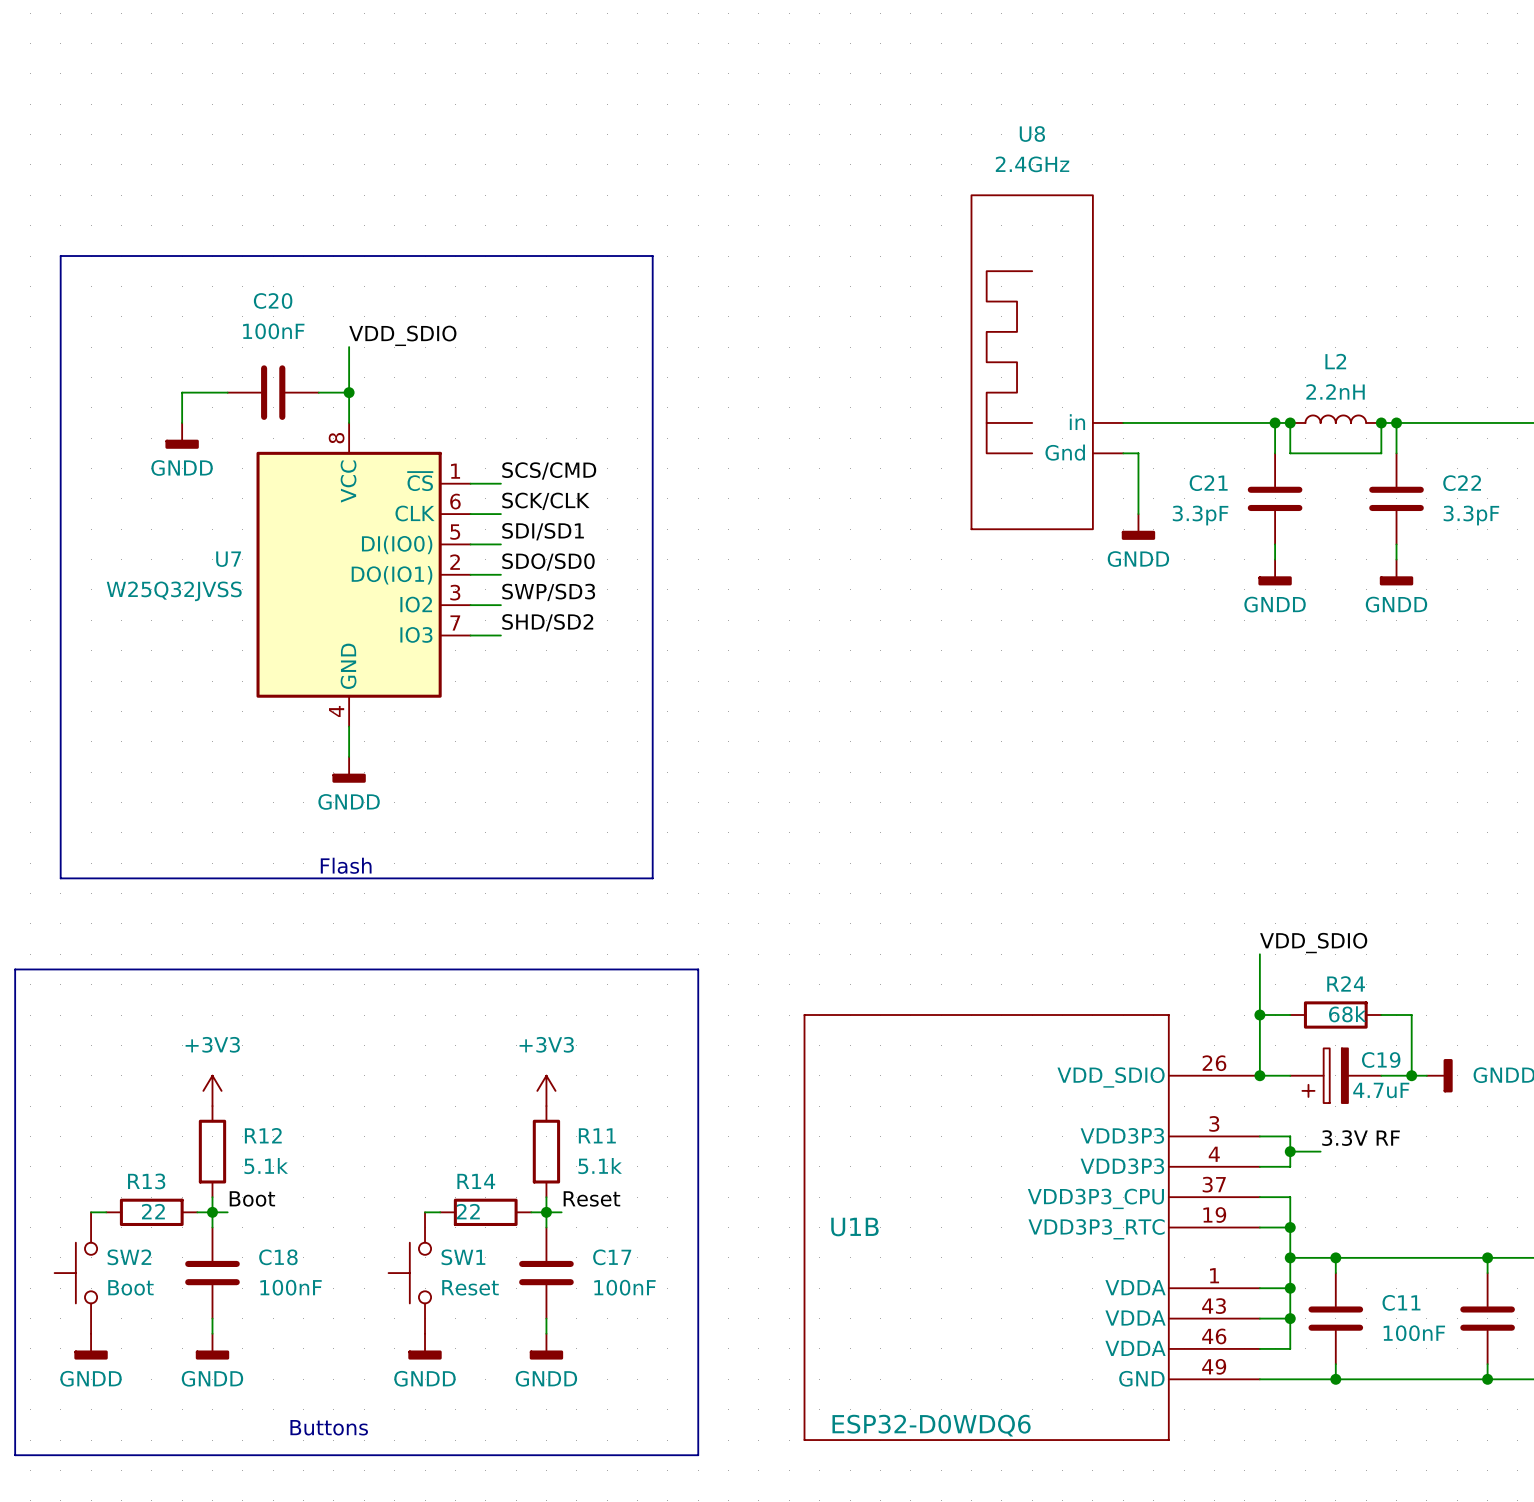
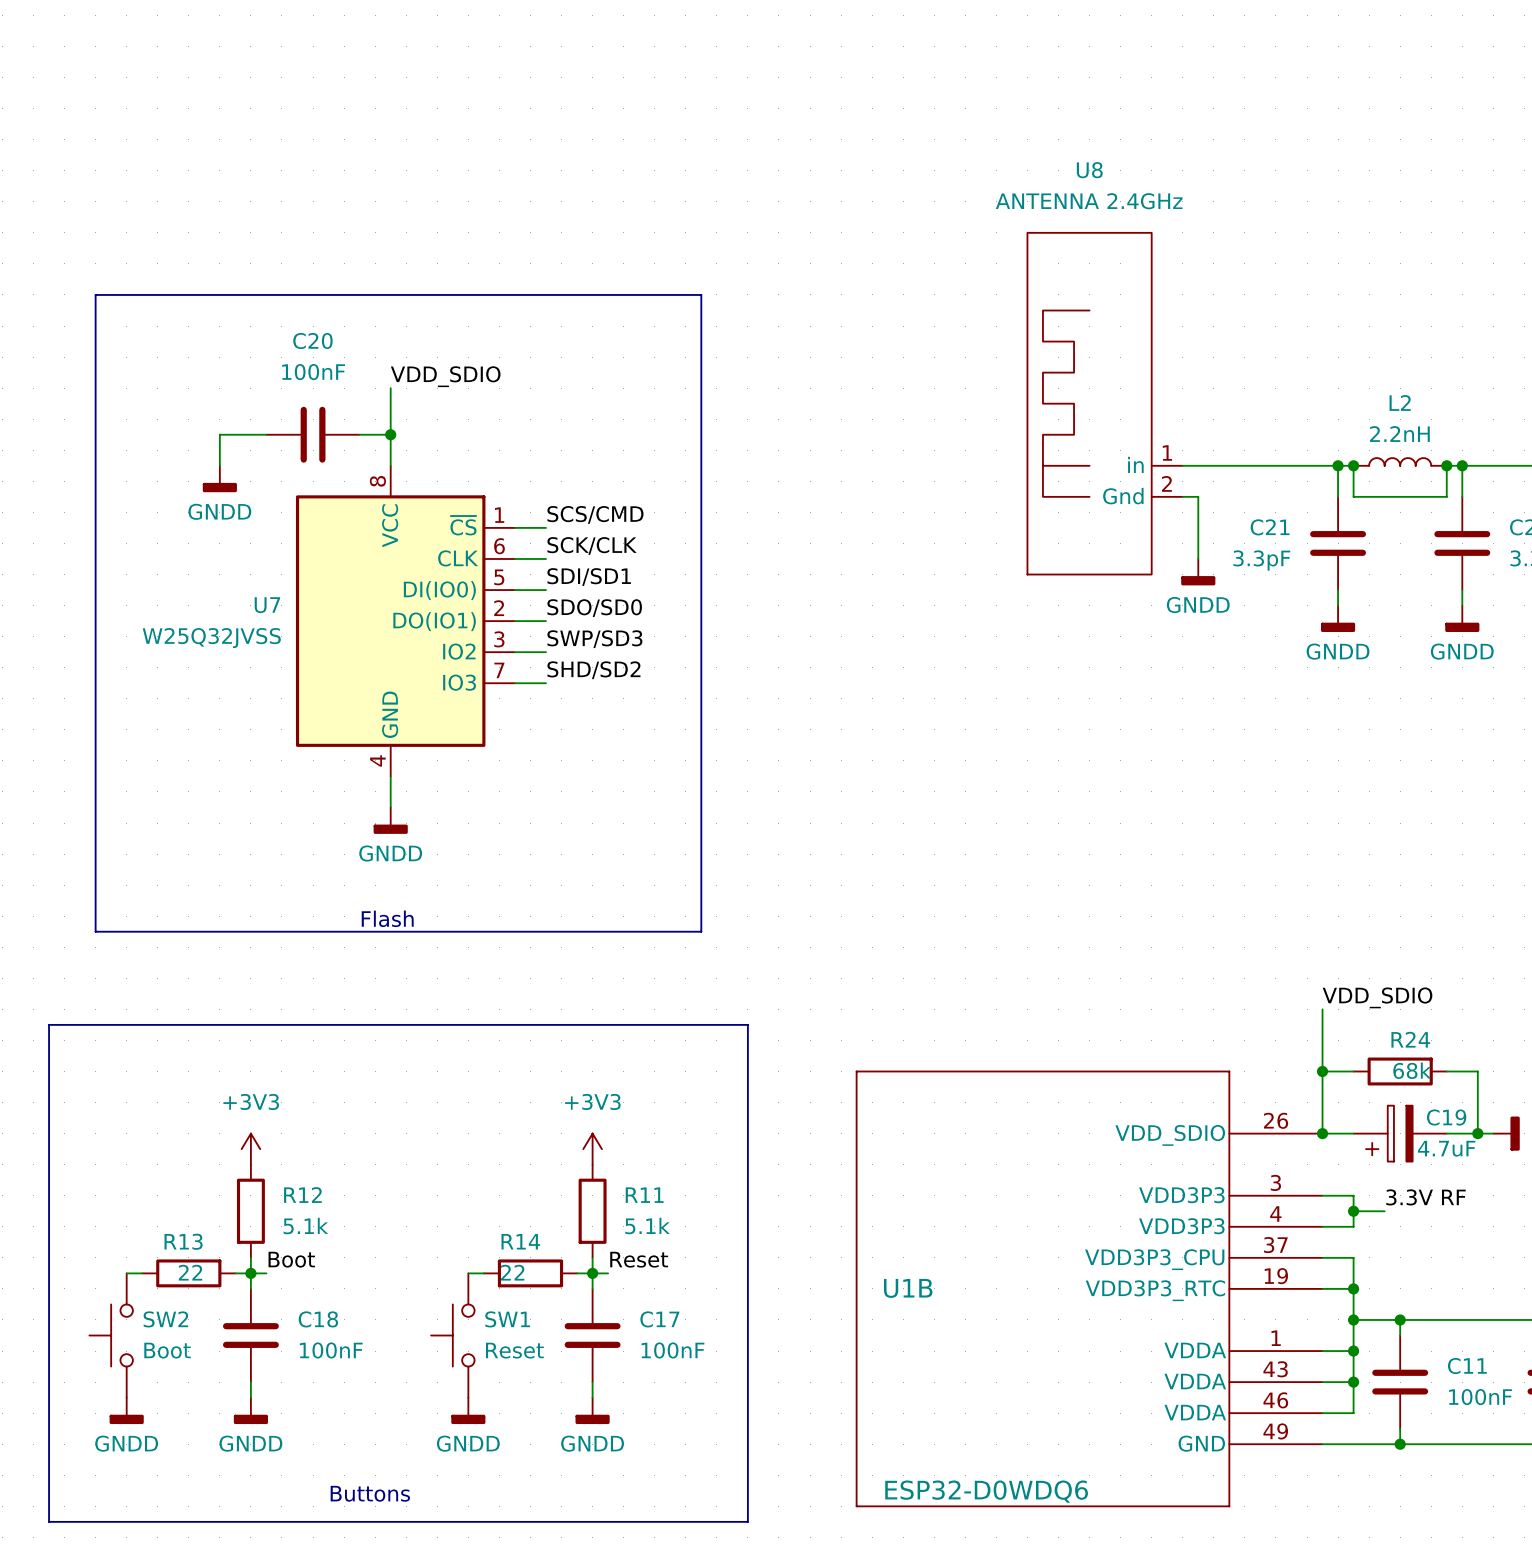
U8 value: 2.4GHz (1032, 164) -> ANTENNA 2.4GHz (1089, 201)
U8 pin number: none -> 1 (1167, 453)
U8 pin number: none -> 2 (1166, 483)

